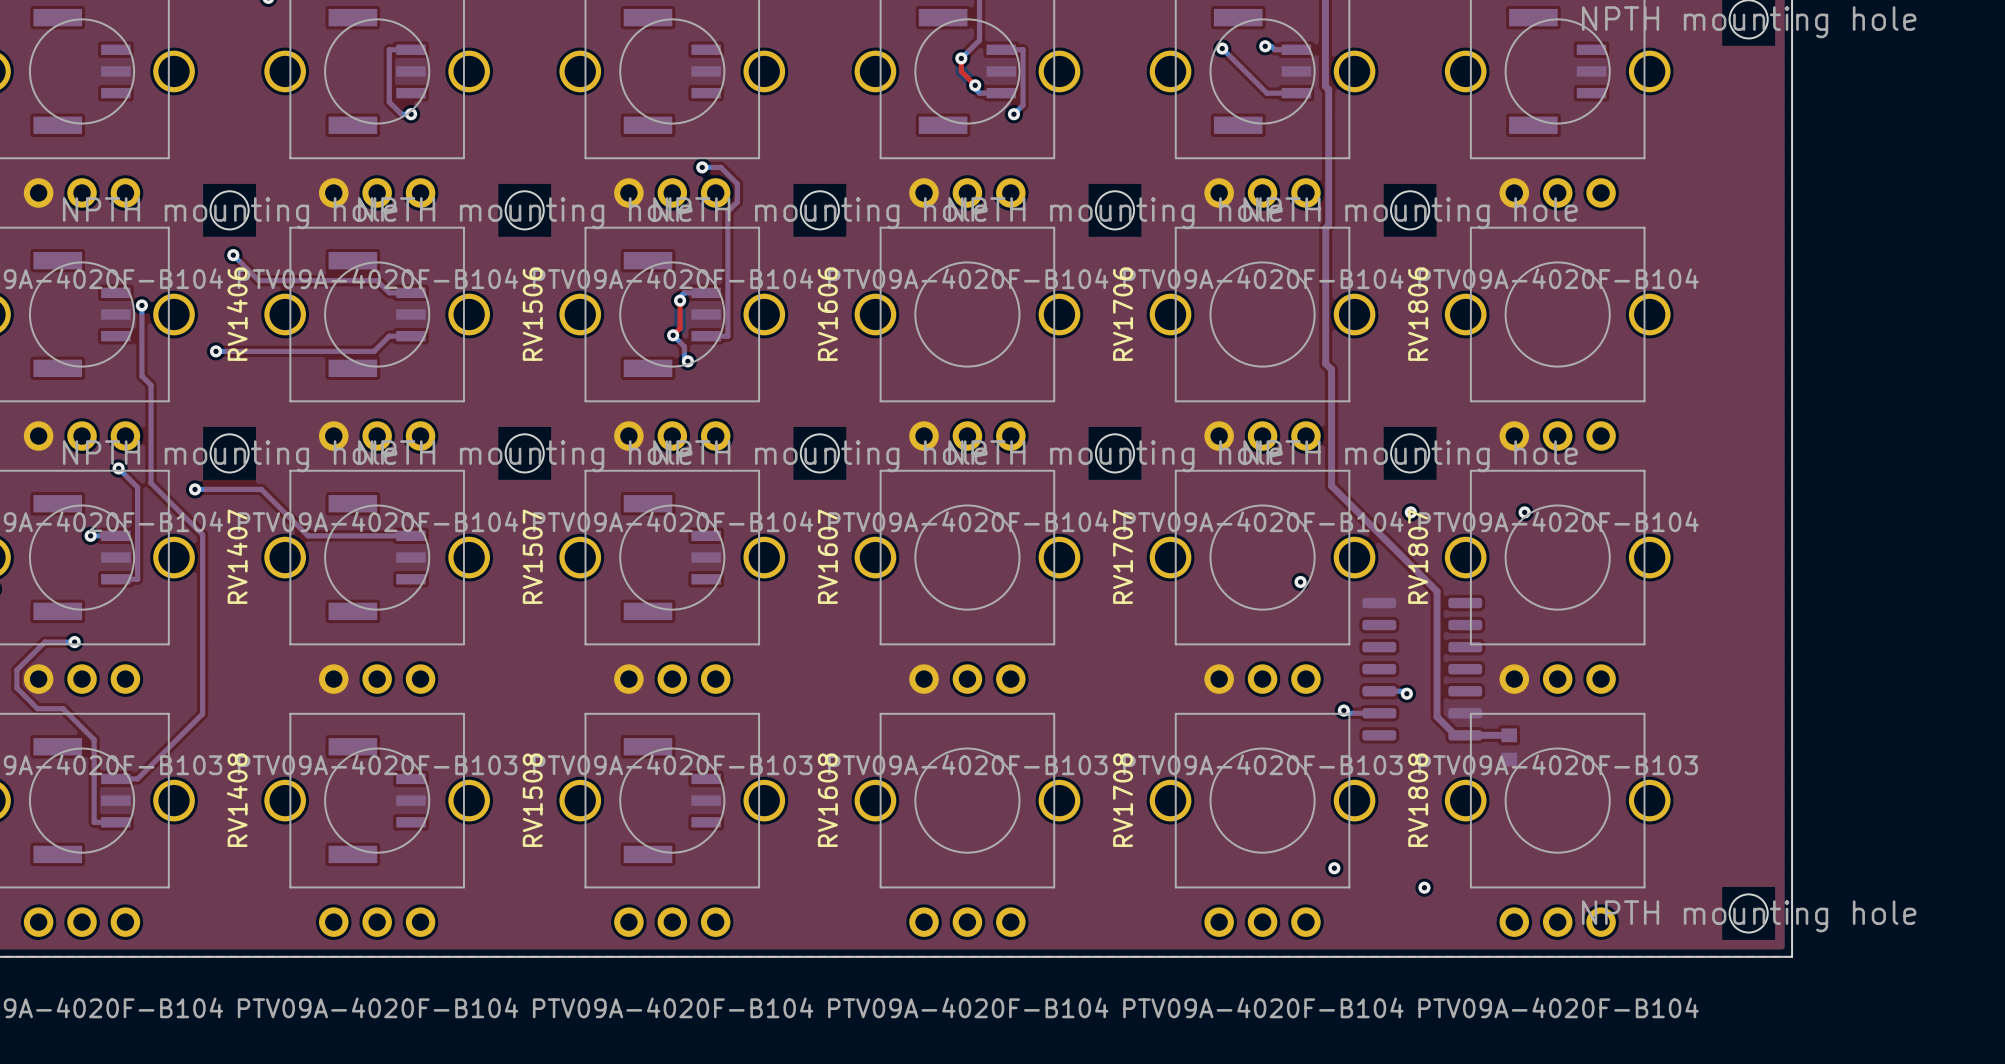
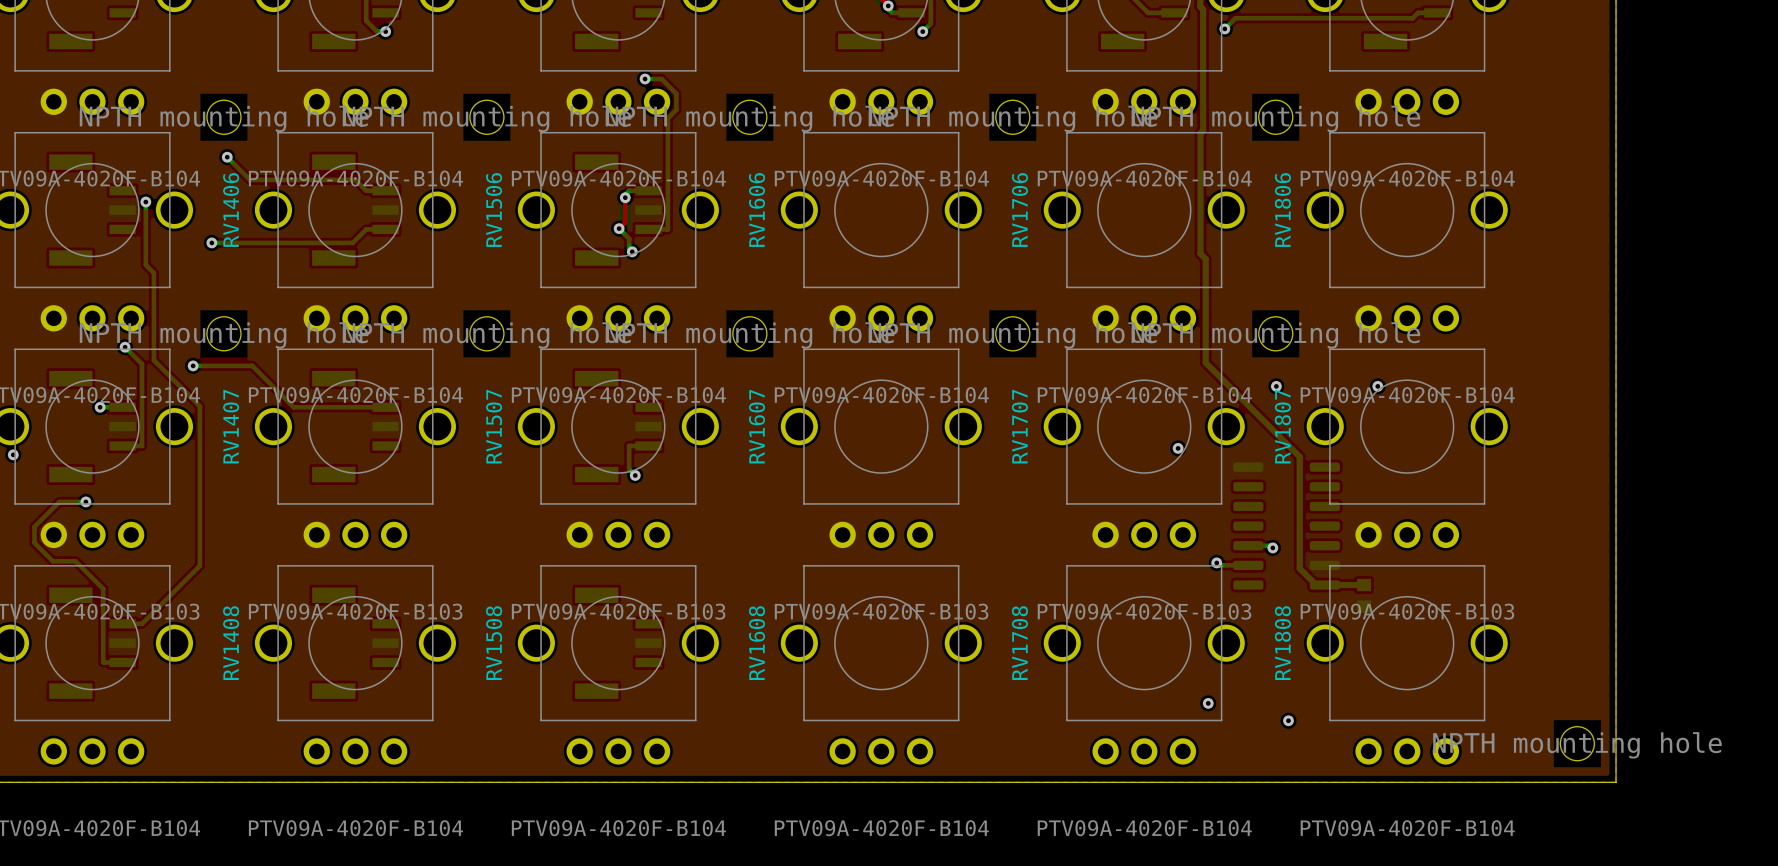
bottom track: none -> (1437, 12) (1418, 12) (1412, 18) (1235, 18) (1224, 28)
via: none -> (1224, 28)
bottom track: none -> (648, 445) (629, 445) (629, 469) (635, 475)
via: none -> (635, 475)

